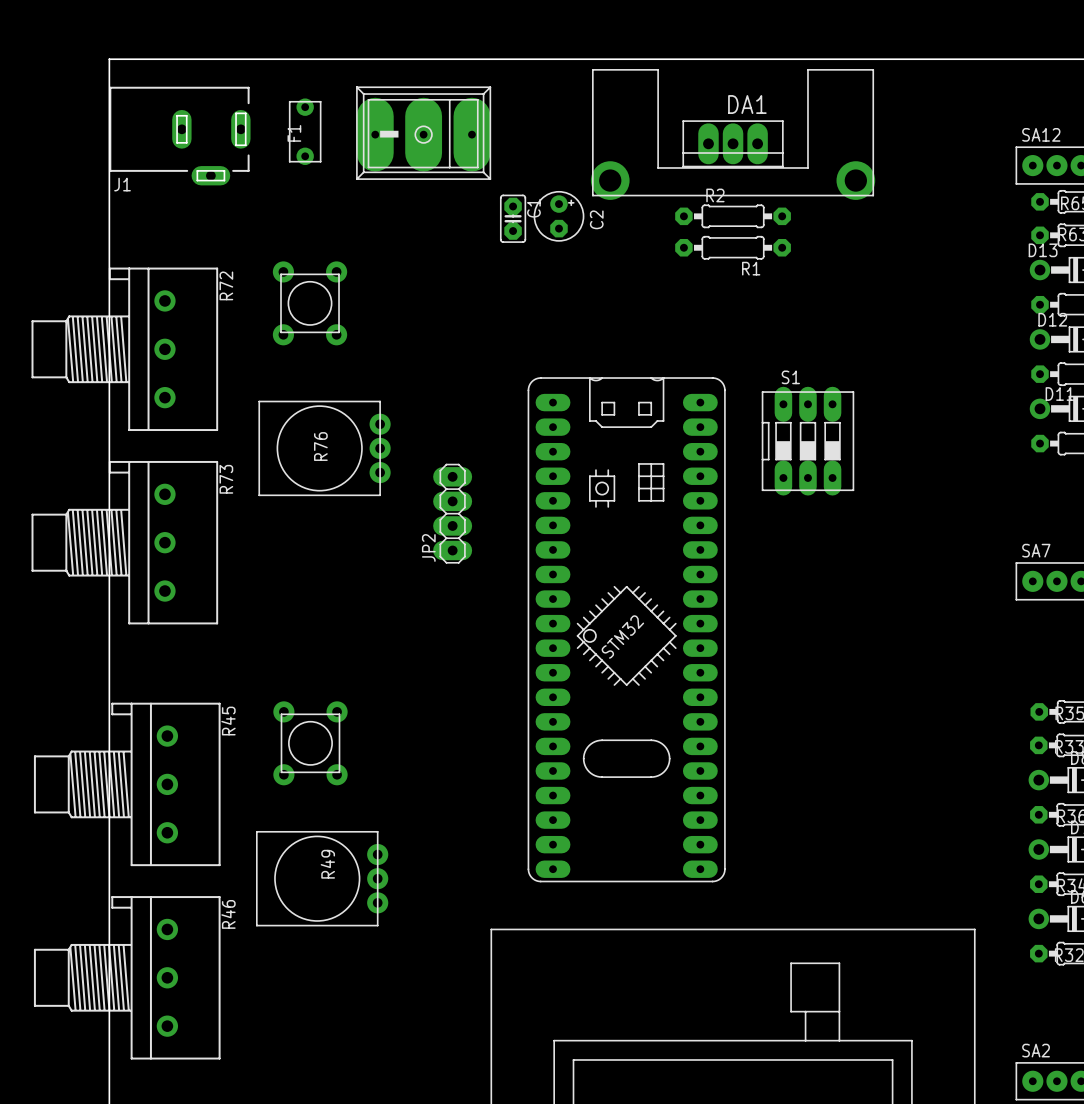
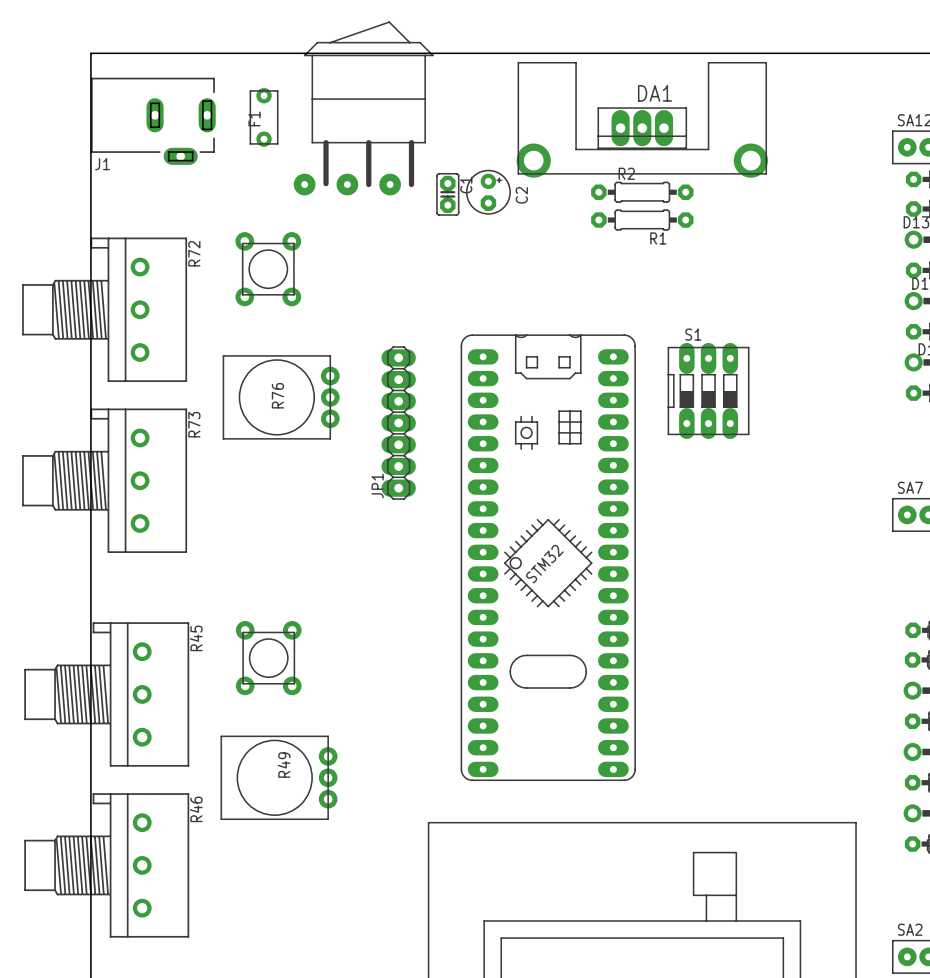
part: none -> (363, 108)
part: (423, 133) -> none
JP1: none -> (398, 423)
JP2: (452, 513) -> none

